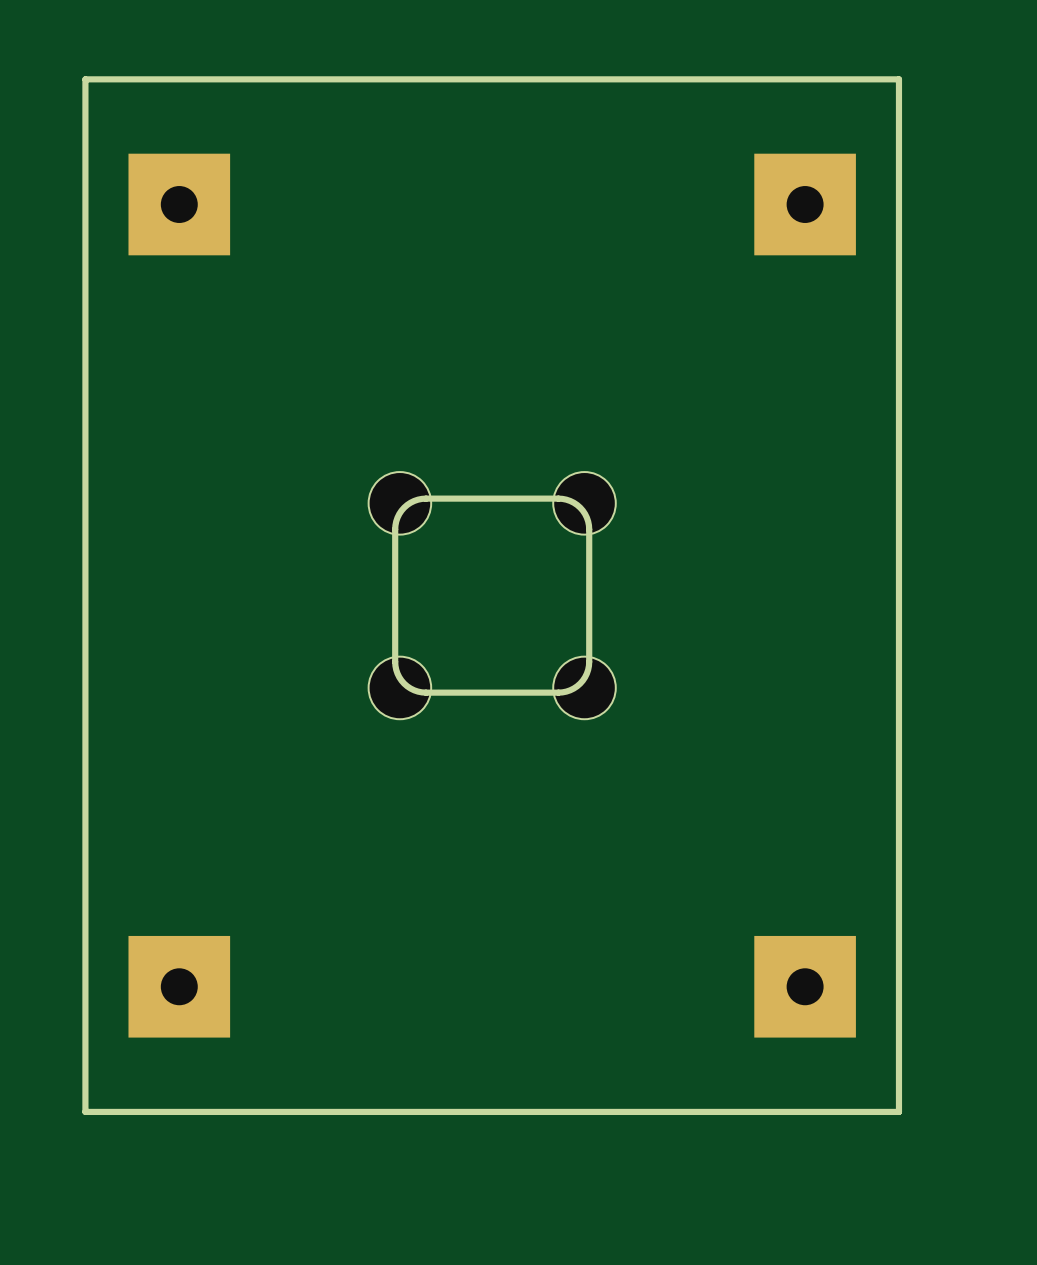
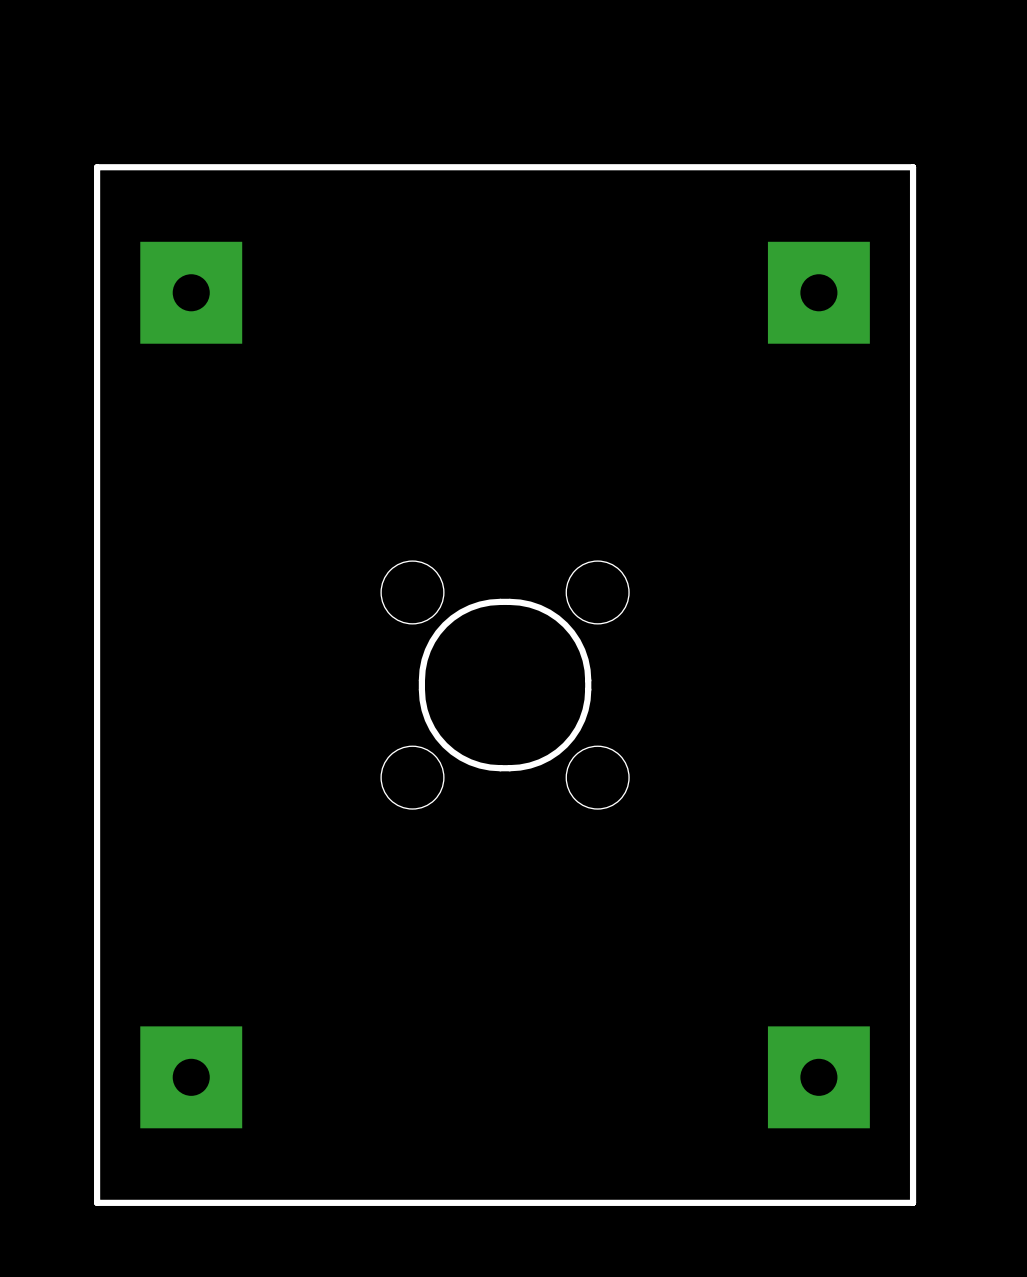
board edge: (558, 498) (421, 498) (410, 502) (401, 510) (396, 521) (395, 529) (395, 661) (399, 677) (407, 686) (418, 691) (425, 692) (558, 692) (573, 688) (582, 680) (588, 669) (589, 661) (588, 525) (585, 514) (580, 507) (570, 500) (558, 498) -> (509, 601) (530, 604) (549, 612) (572, 632) (585, 660) (588, 680) (587, 699) (577, 728) (557, 752) (530, 765) (509, 768) (490, 767) (461, 757) (438, 737) (424, 710) (421, 689) (422, 670) (432, 641) (452, 618) (480, 604) (509, 601)

